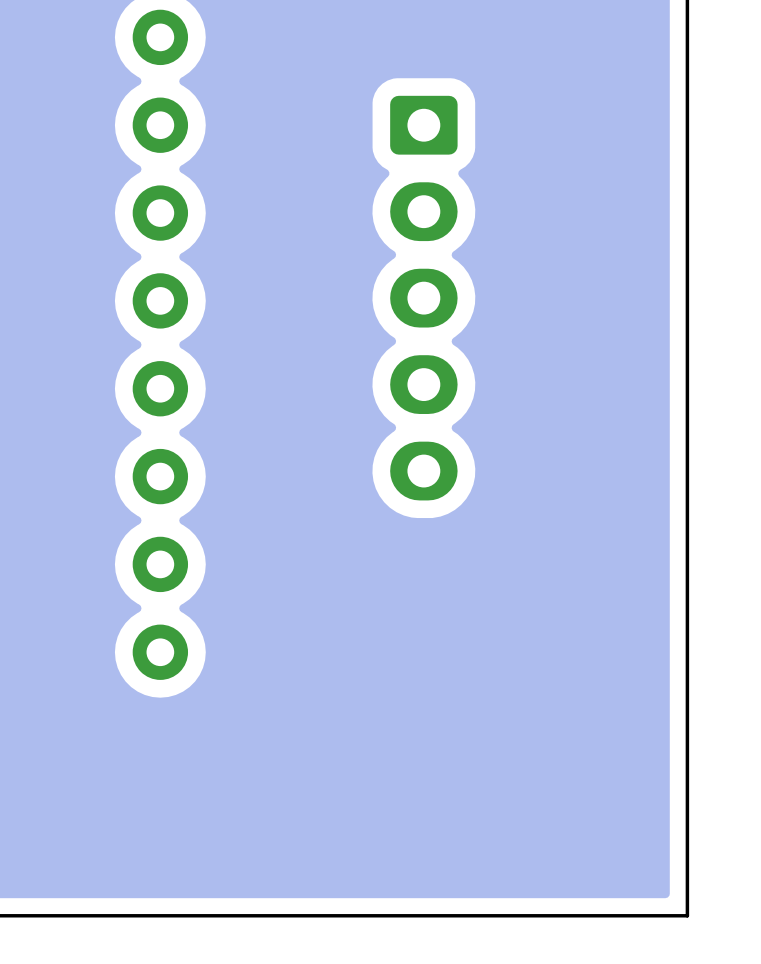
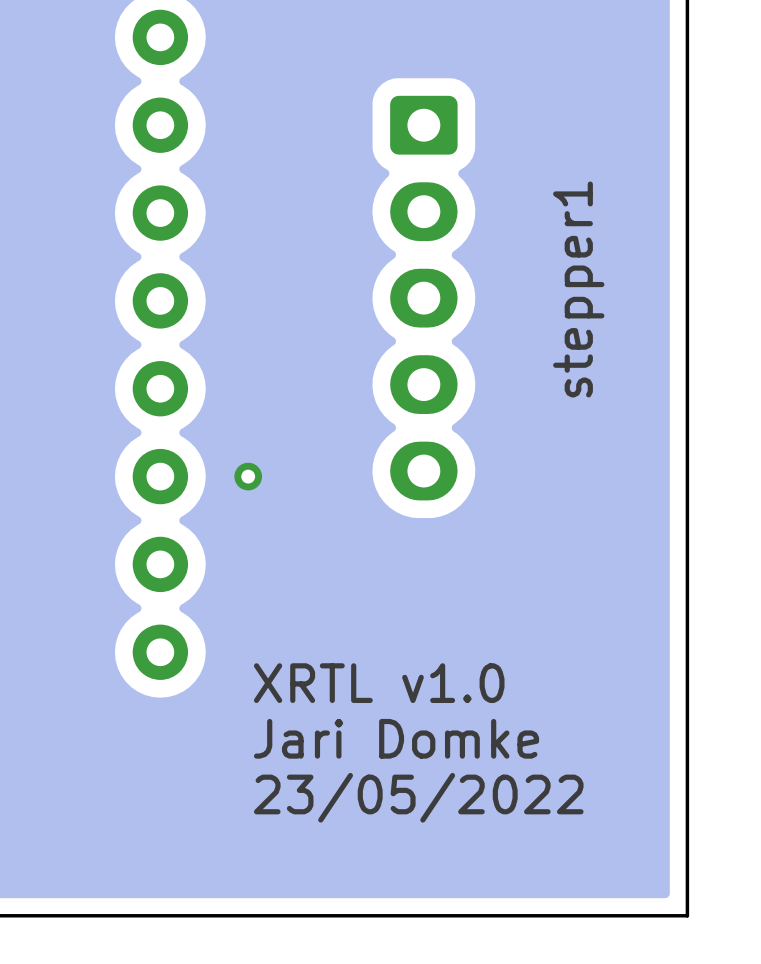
text: none -> stepper1 (578, 289)
via: none -> (248, 476)
text: none -> XRTL v1.0 (379, 683)
text: none -> Jari Domke (396, 738)
text: none -> 23/05/2022 (418, 797)

